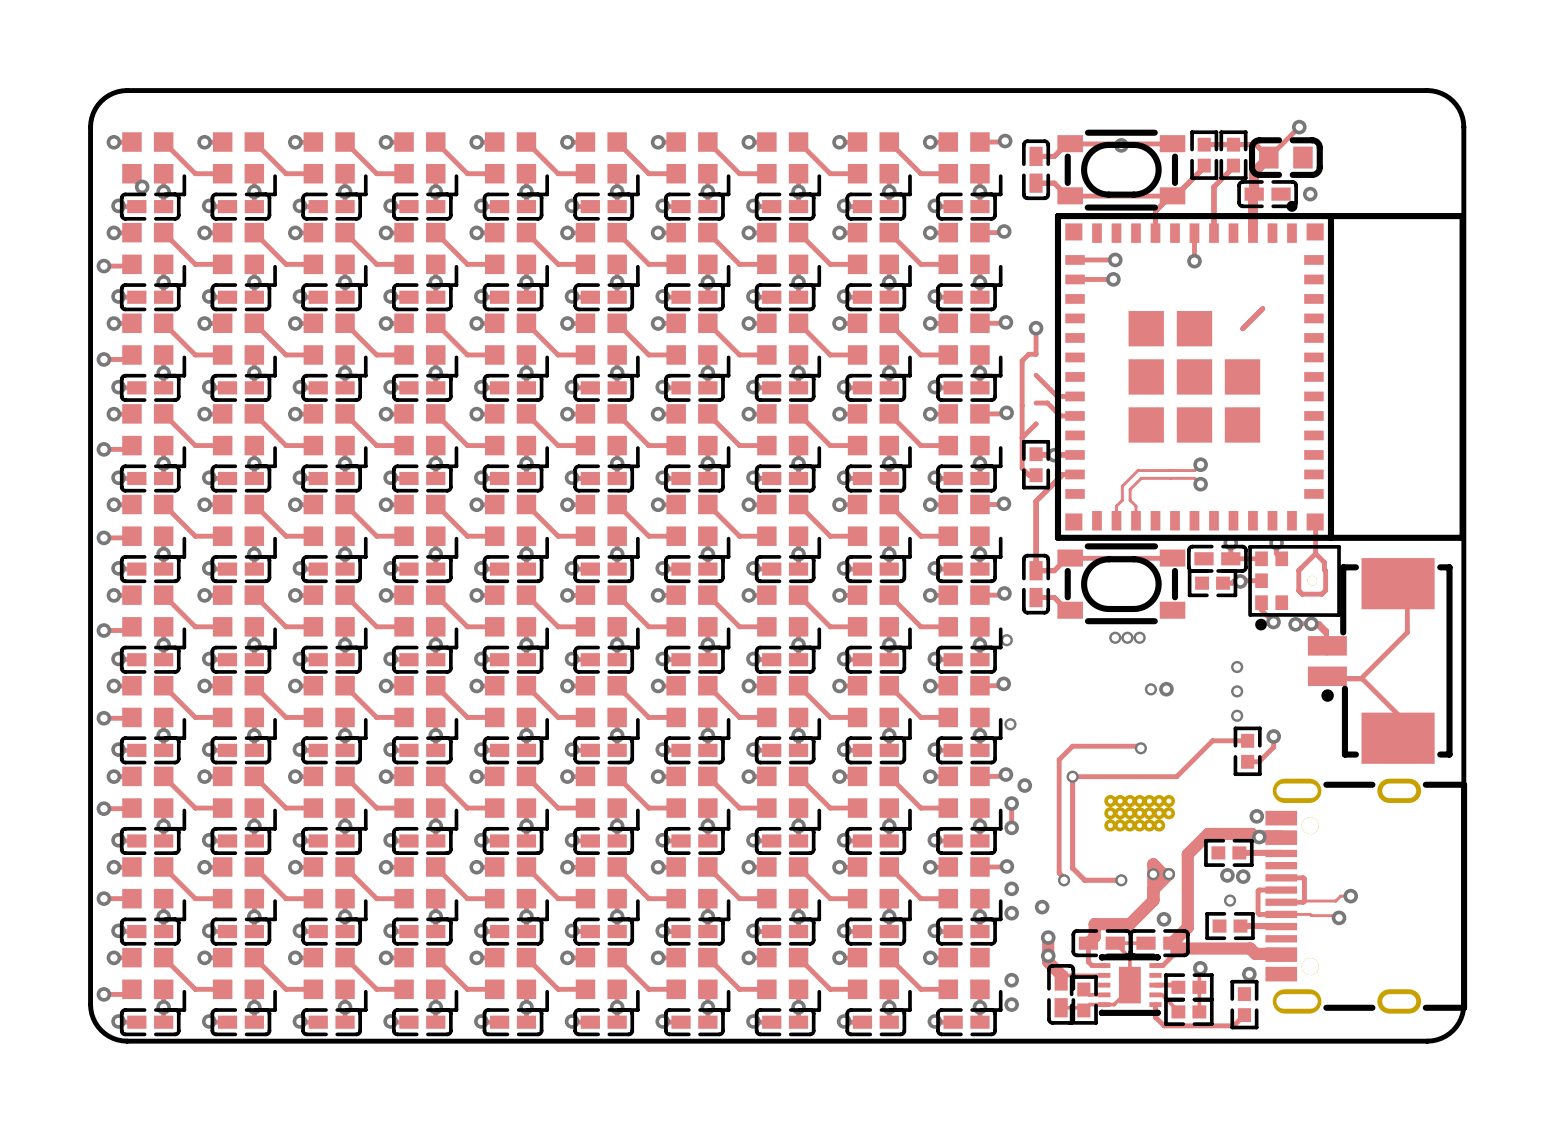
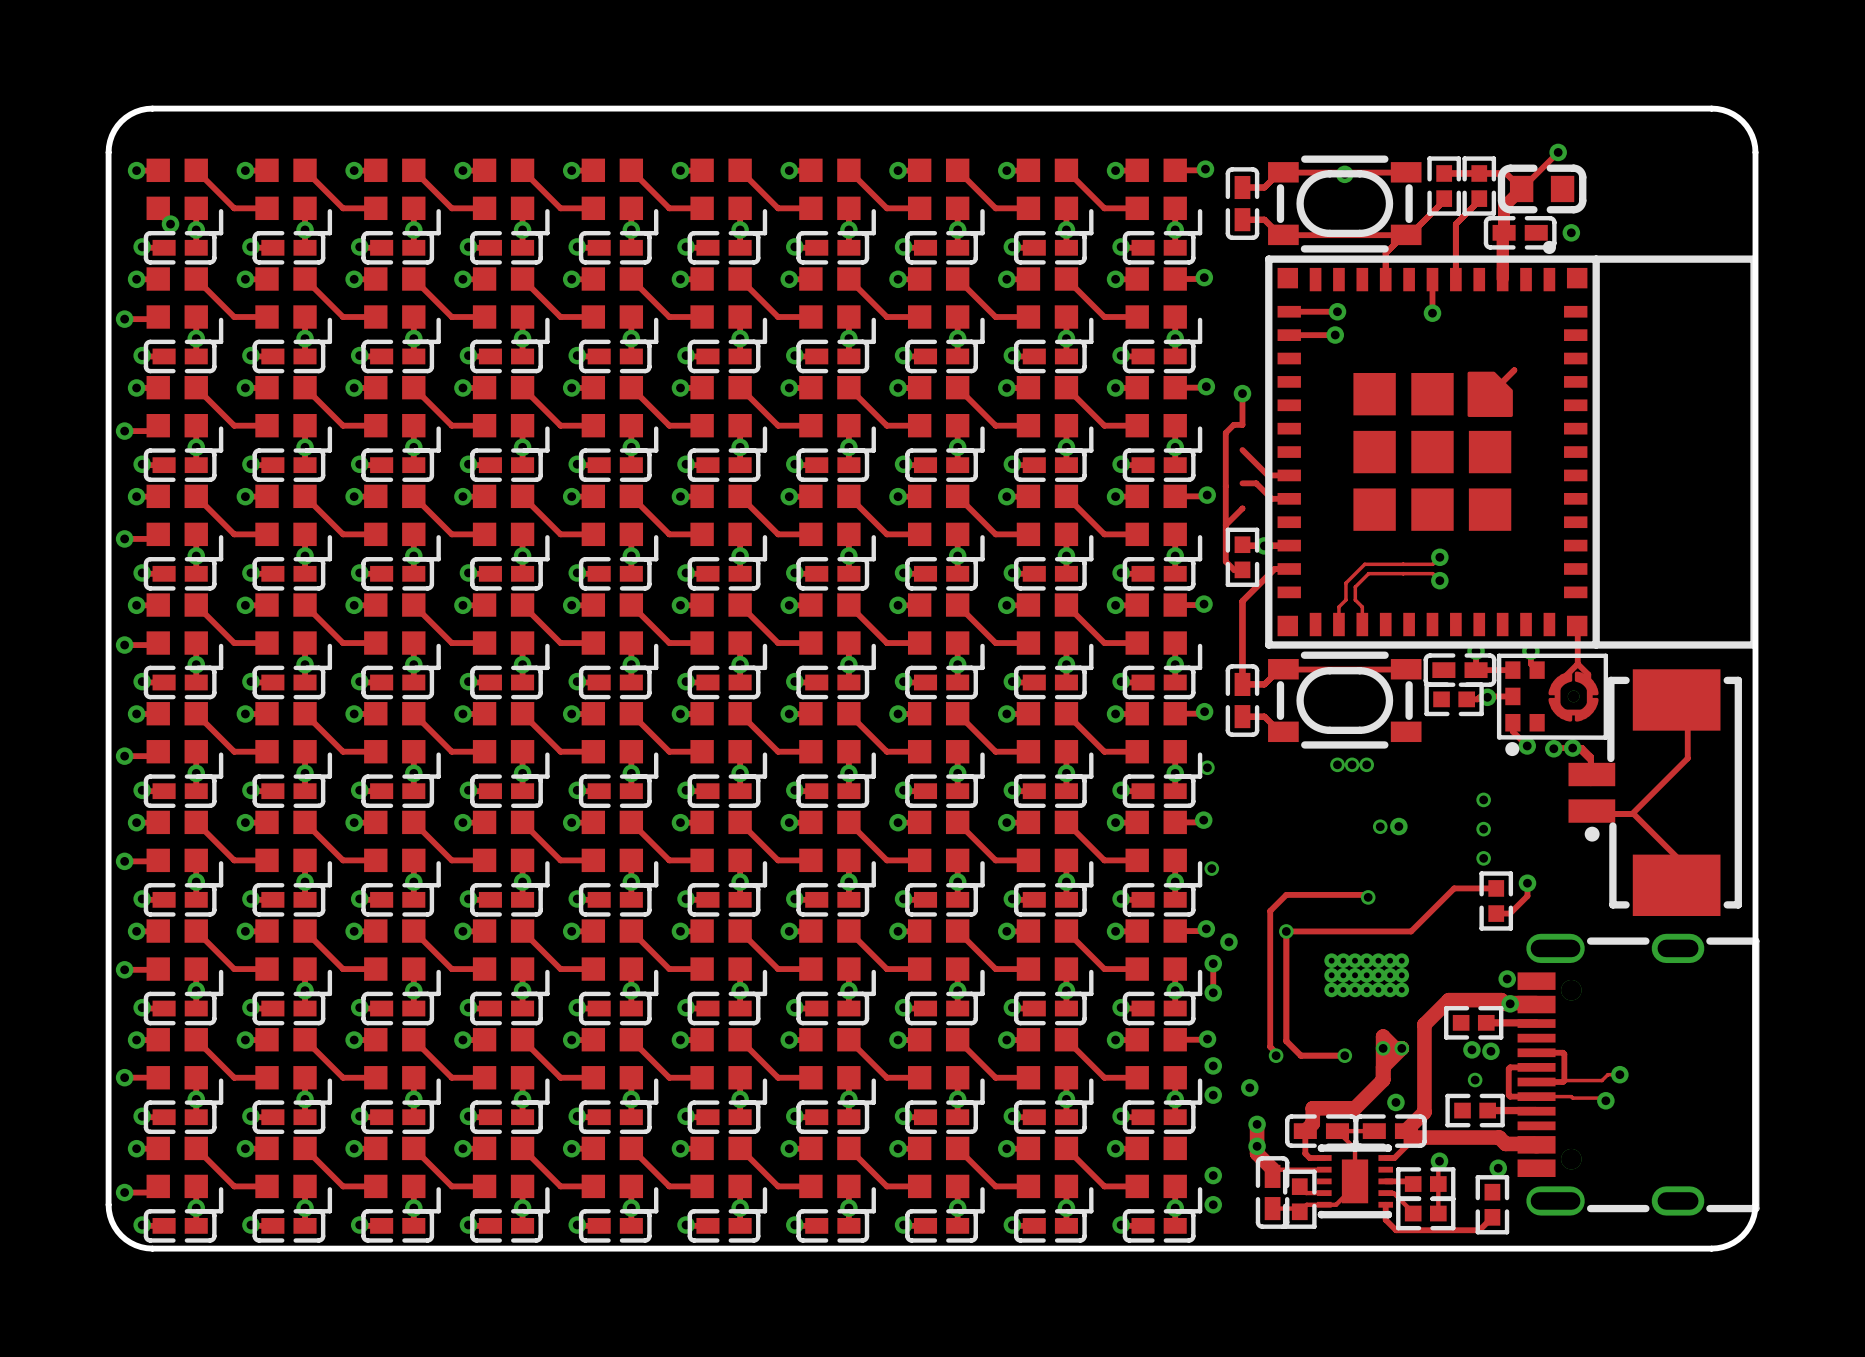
part footprint: [1054, 200, 1466, 541] -> [1265, 240, 1758, 649]
part footprint: [1248, 545, 1341, 631] -> [1496, 653, 1609, 757]
part footprint: [1104, 794, 1175, 832] -> [1324, 953, 1410, 998]

